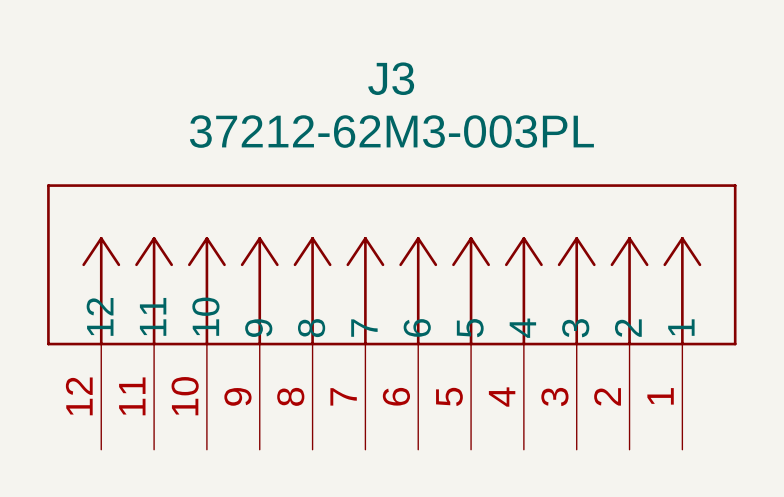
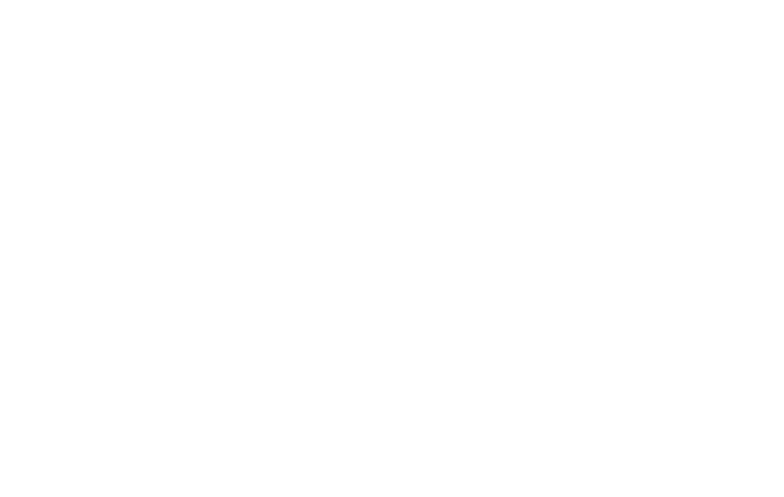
J3: 37212-62M3-003PL (391, 316) -> none

